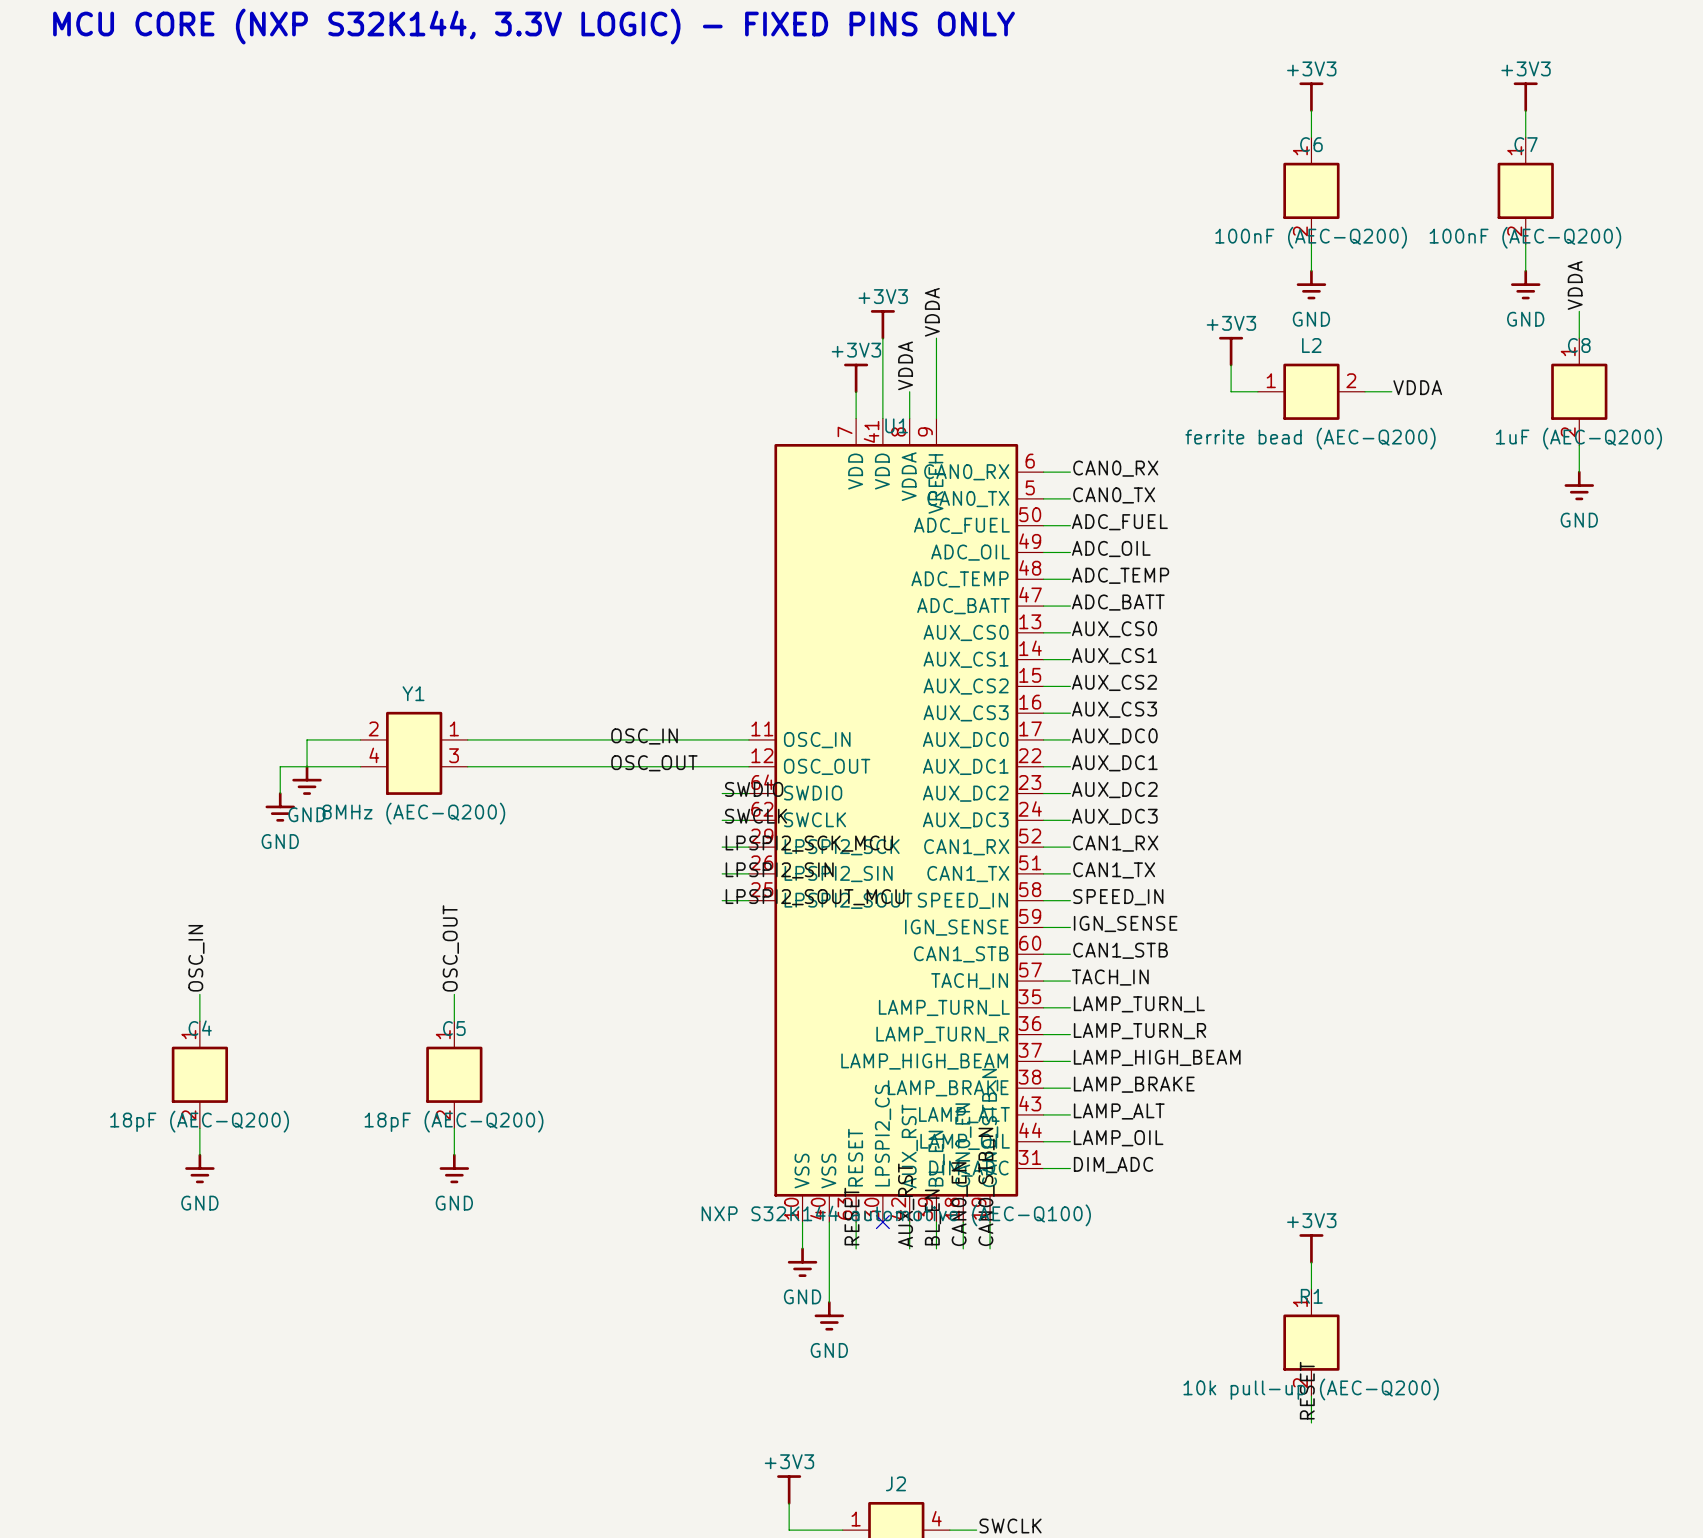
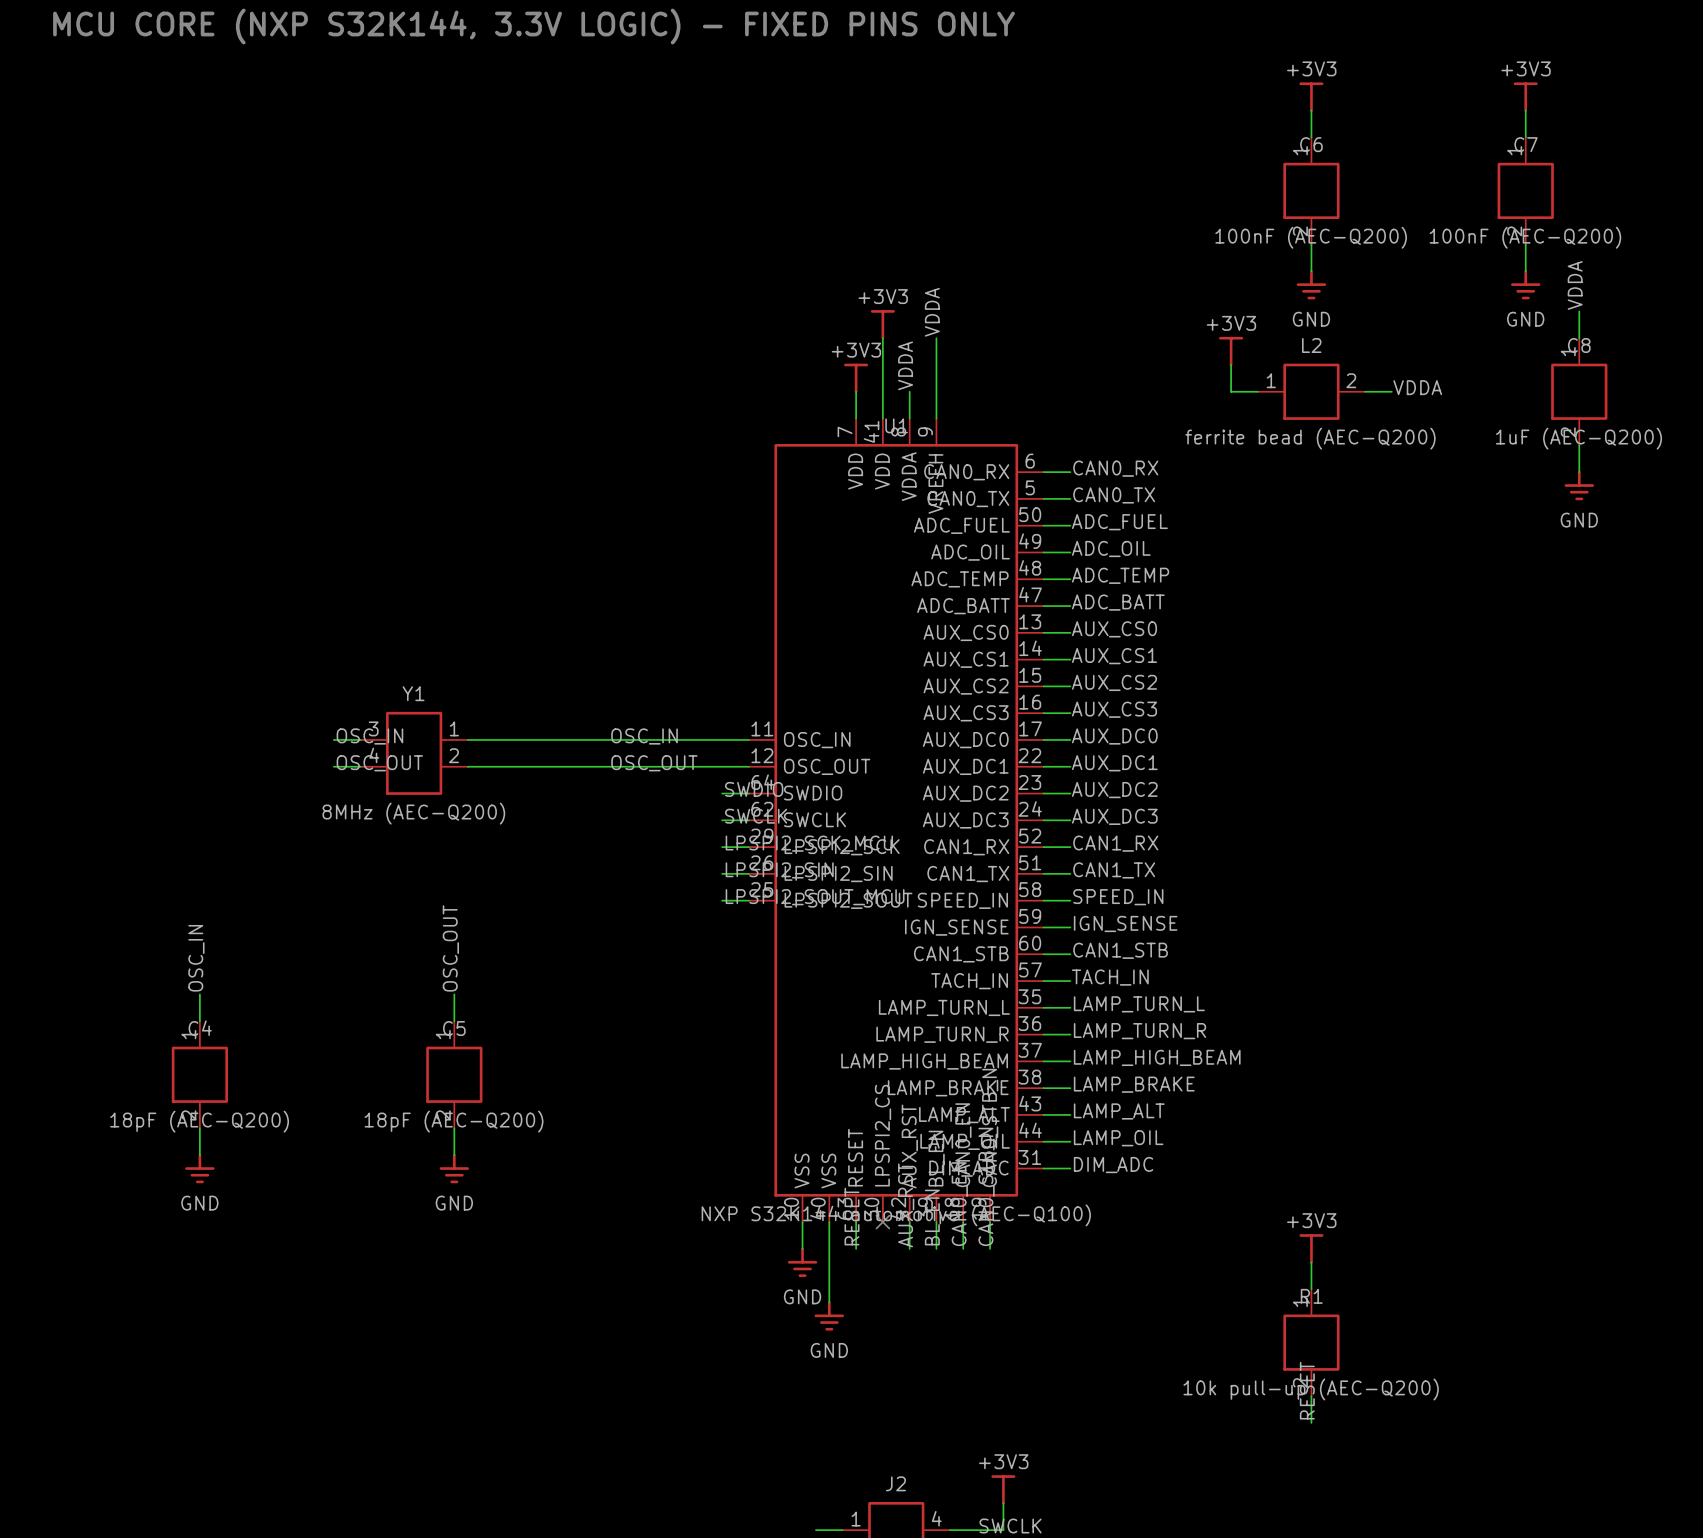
Y1 pin number: 2 (373, 728) -> 3 (373, 728)
label: none -> OSC_IN (369, 736)
wire: (333, 739) (307, 739) (307, 766) -> none
Y1 pin number: 3 (454, 755) -> 2 (454, 755)
label: none -> OSC_OUT (379, 763)
wire: (333, 766) (280, 766) (280, 793) -> none
power symbol: GND (307, 780) -> none
power symbol: GND (280, 806) -> none
power symbol position: +3V3 (789, 1489) -> +3V3 (1003, 1489)
wire: (789, 1503) (789, 1530) (815, 1530) -> none
wire: none -> (1003, 1503) (1003, 1530) (976, 1530)

